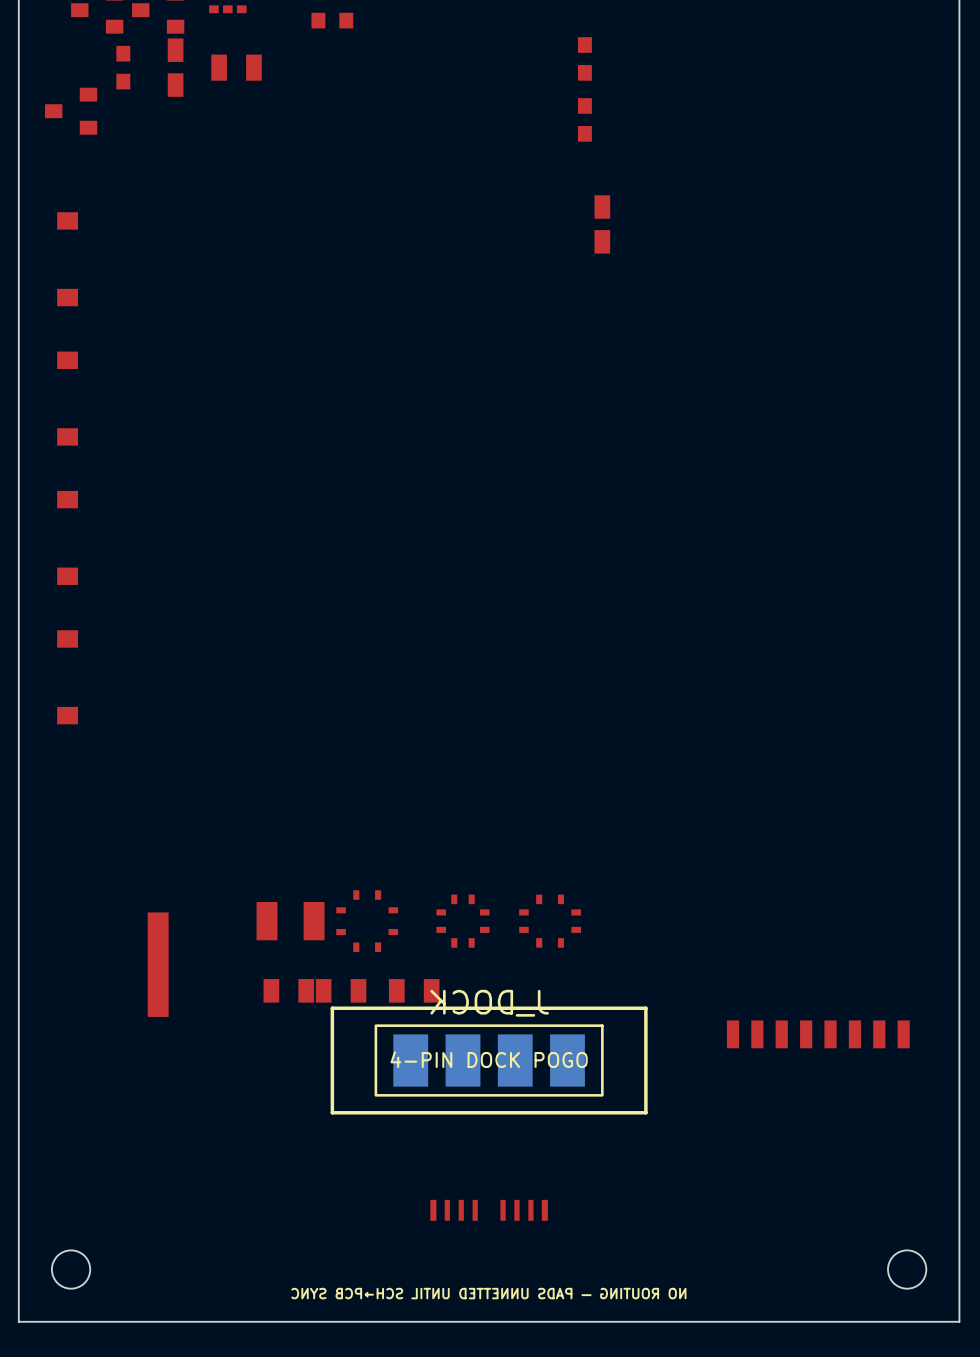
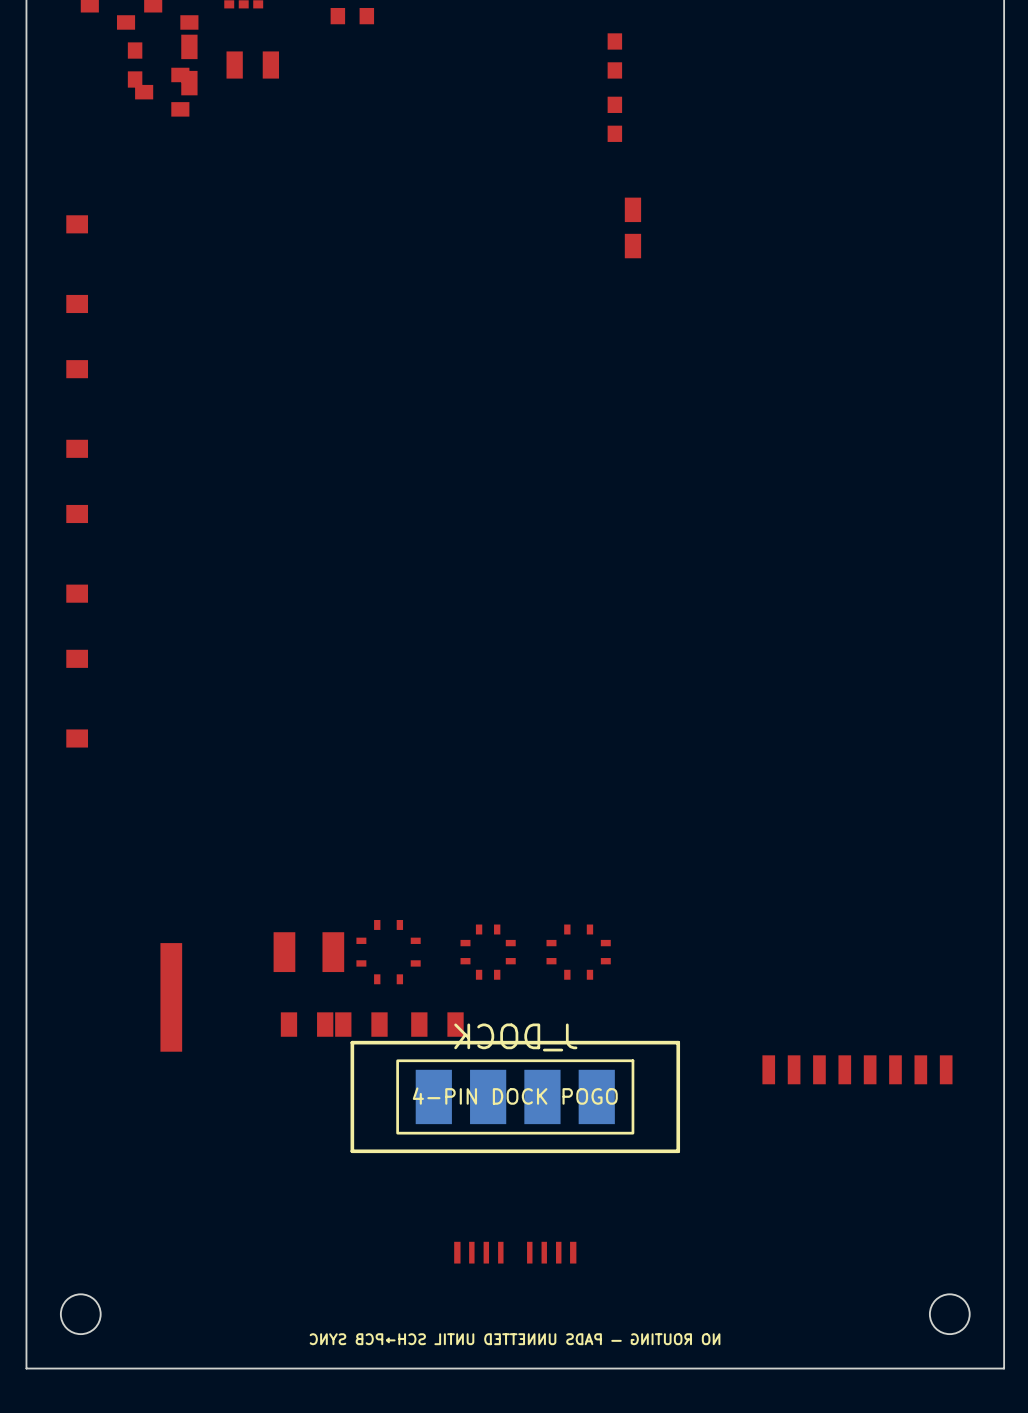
part position: (71, 111) -> (162, 92)

